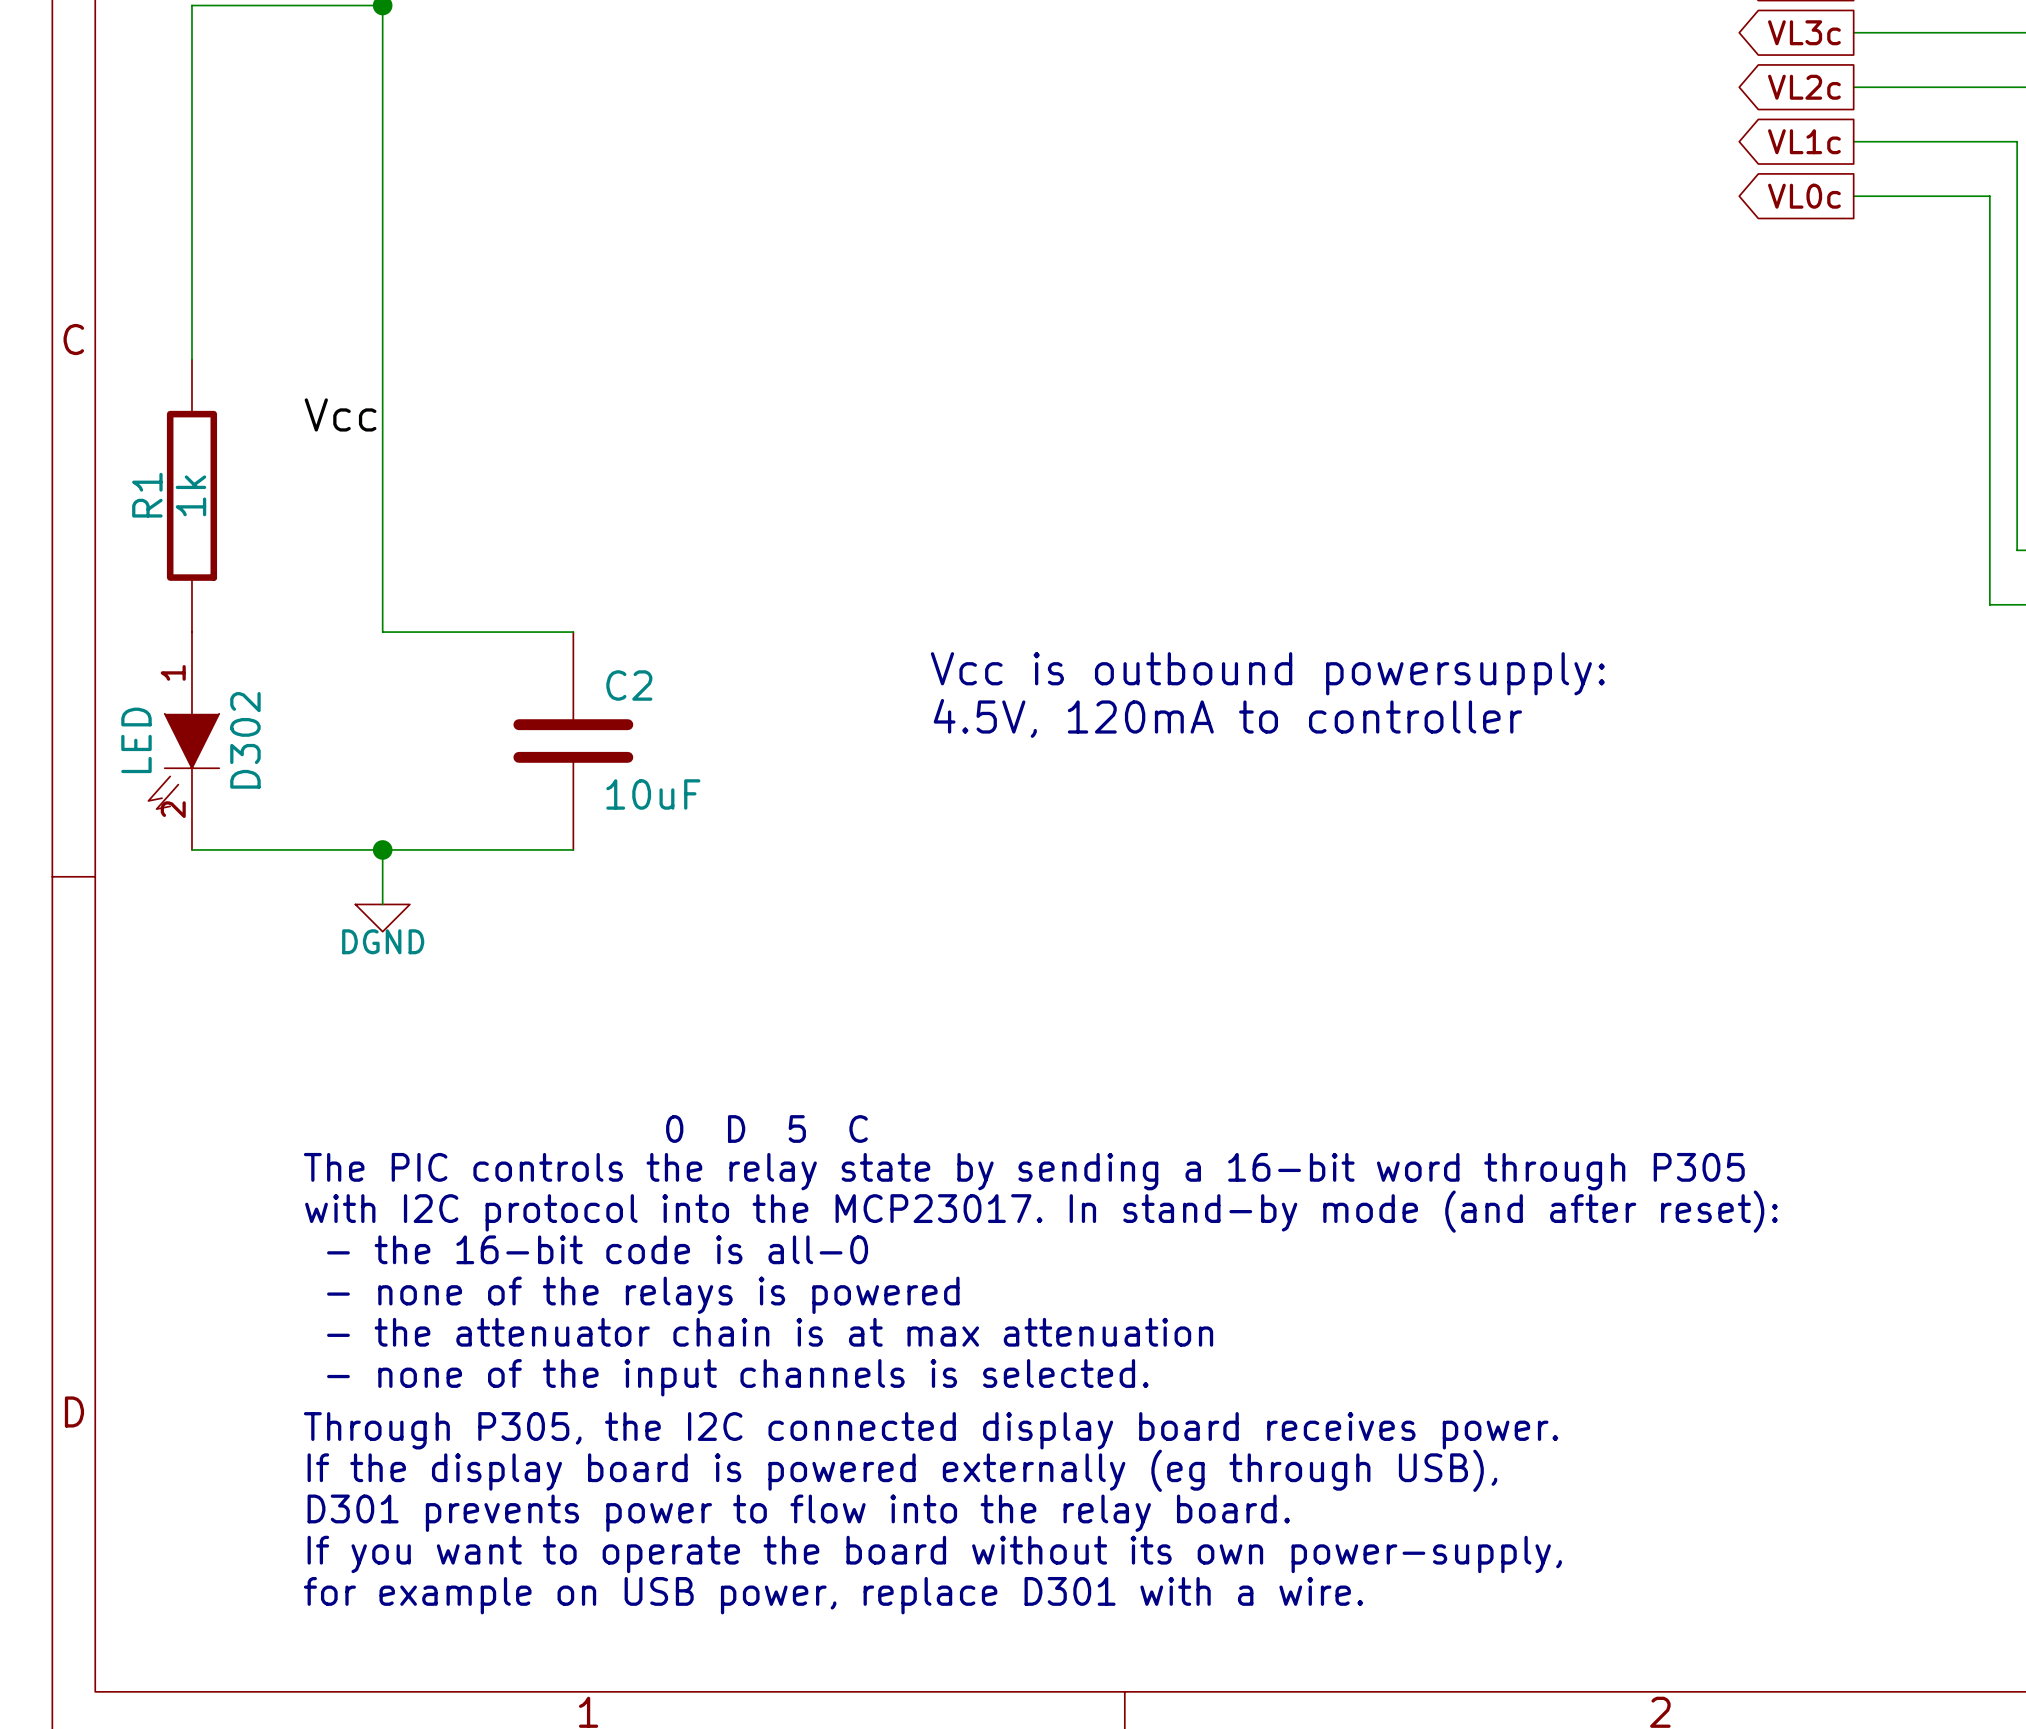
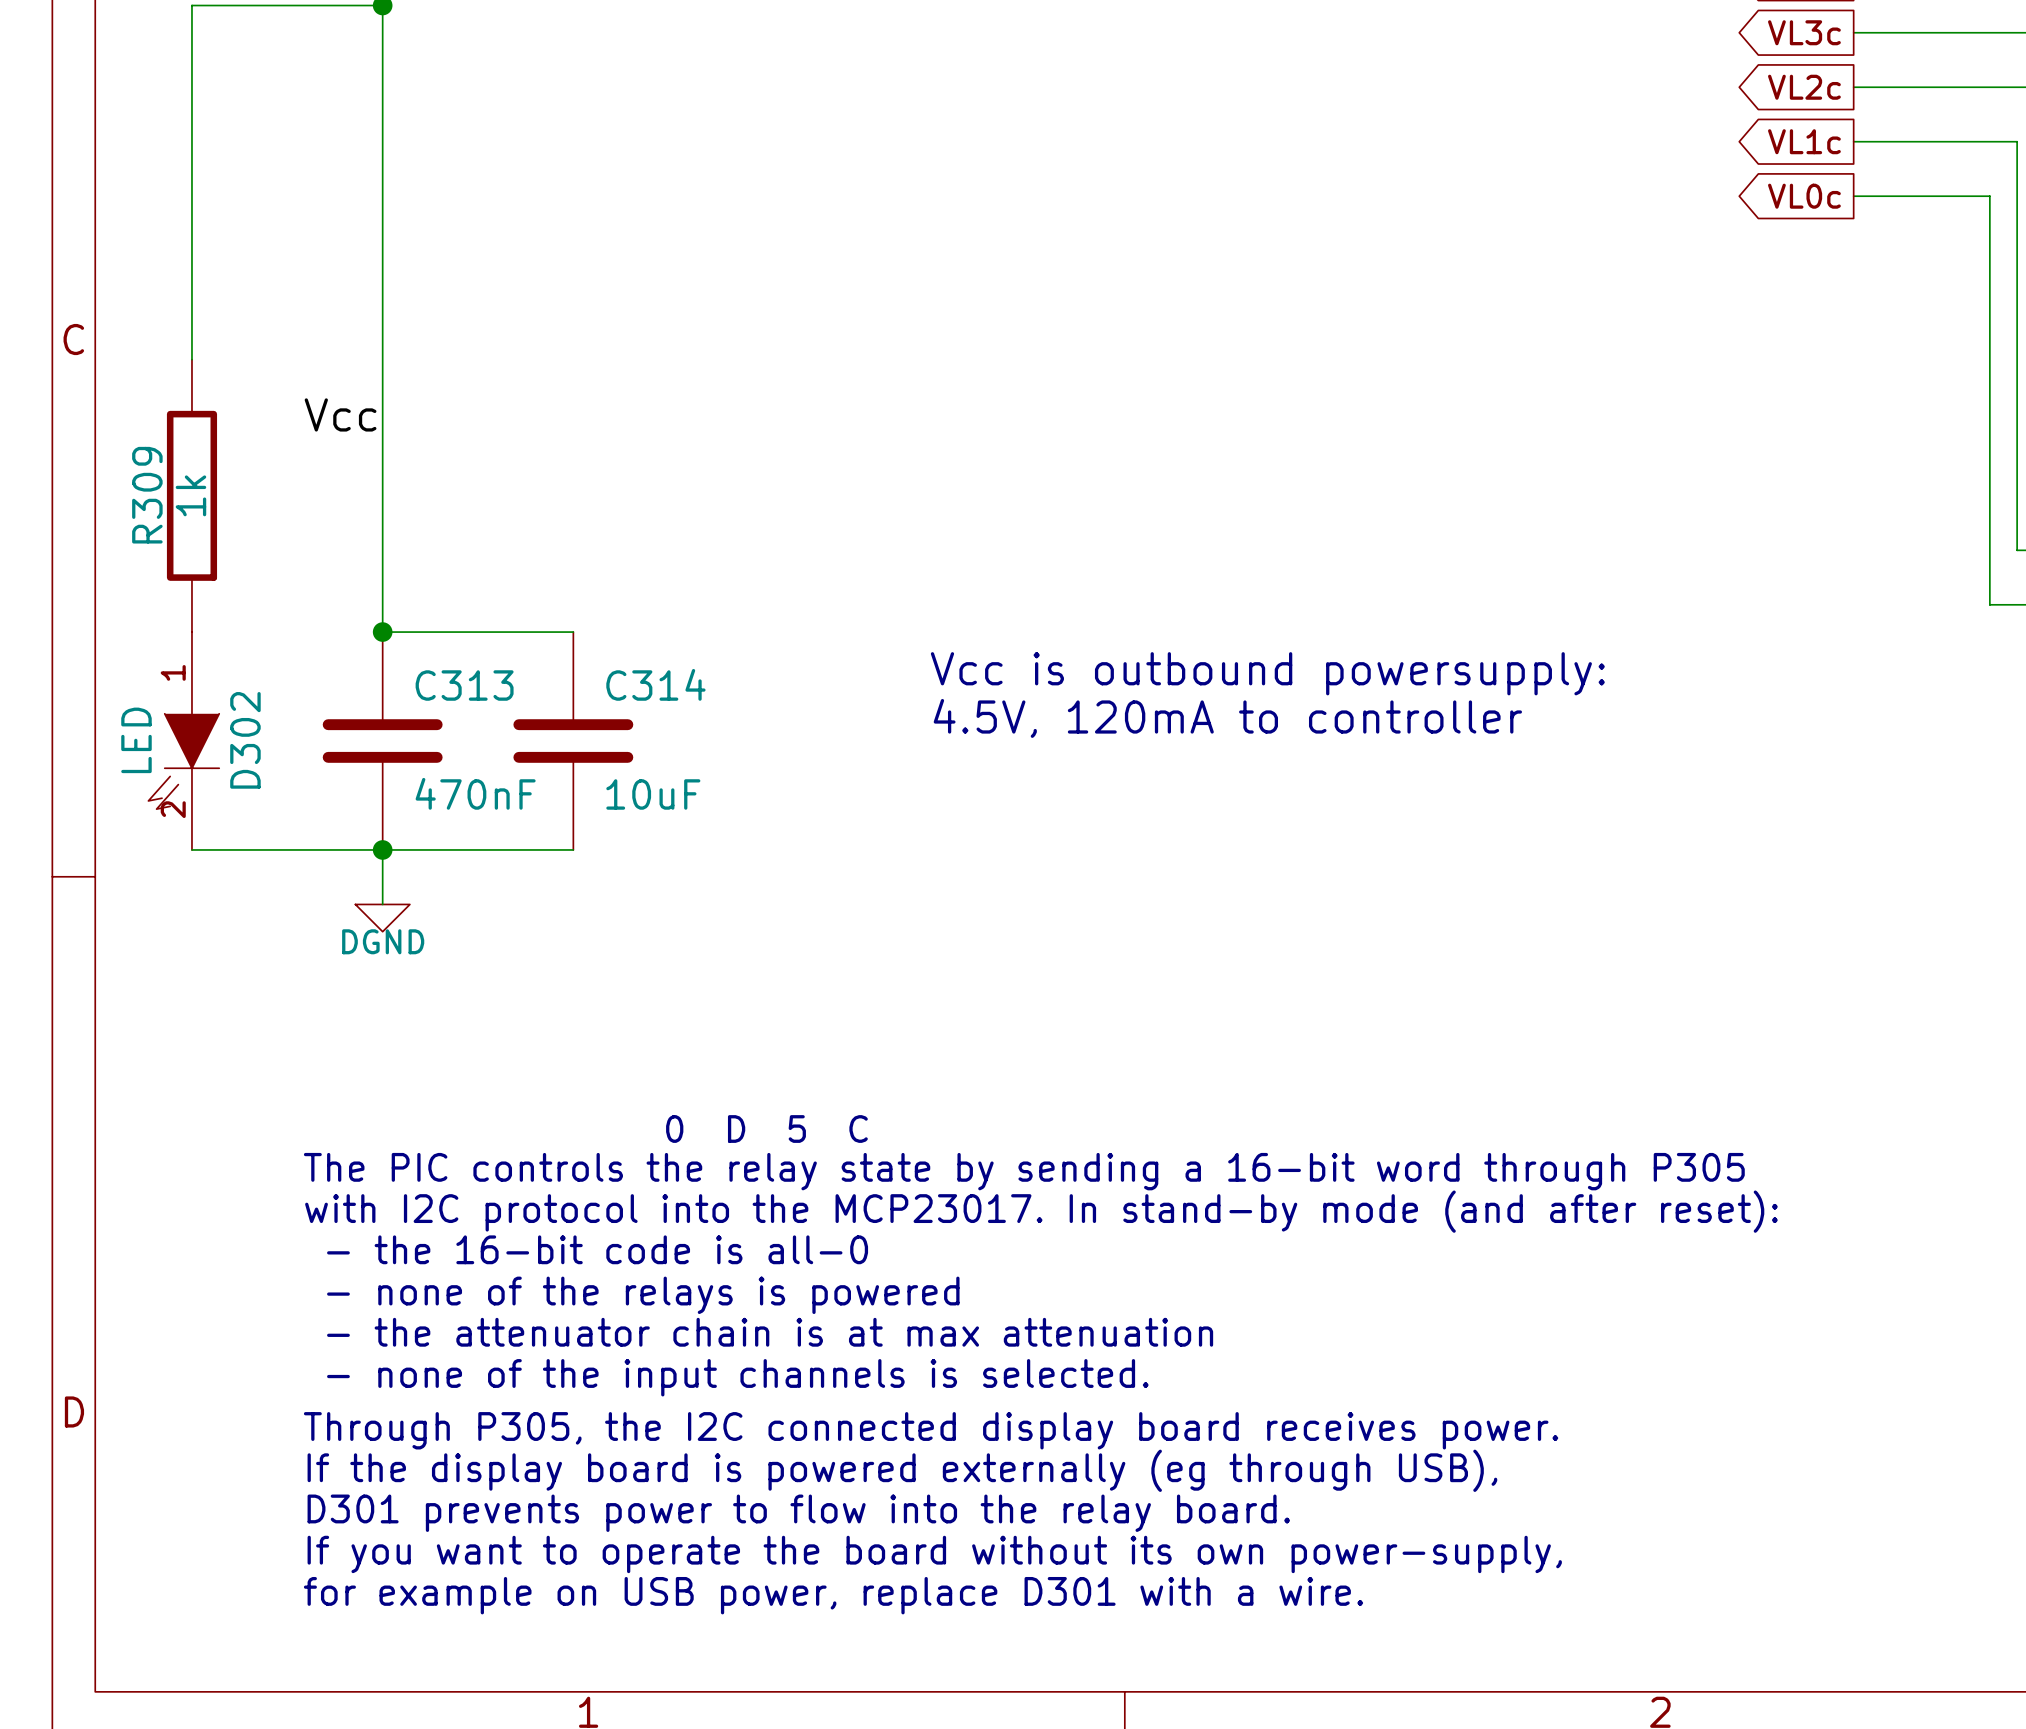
R1 name: R1 (147, 495) -> R309 (147, 495)
junction: none -> (382, 632)
C2 name: C2 (629, 685) -> C314 (655, 684)
C313: none -> 470nF (382, 741)

